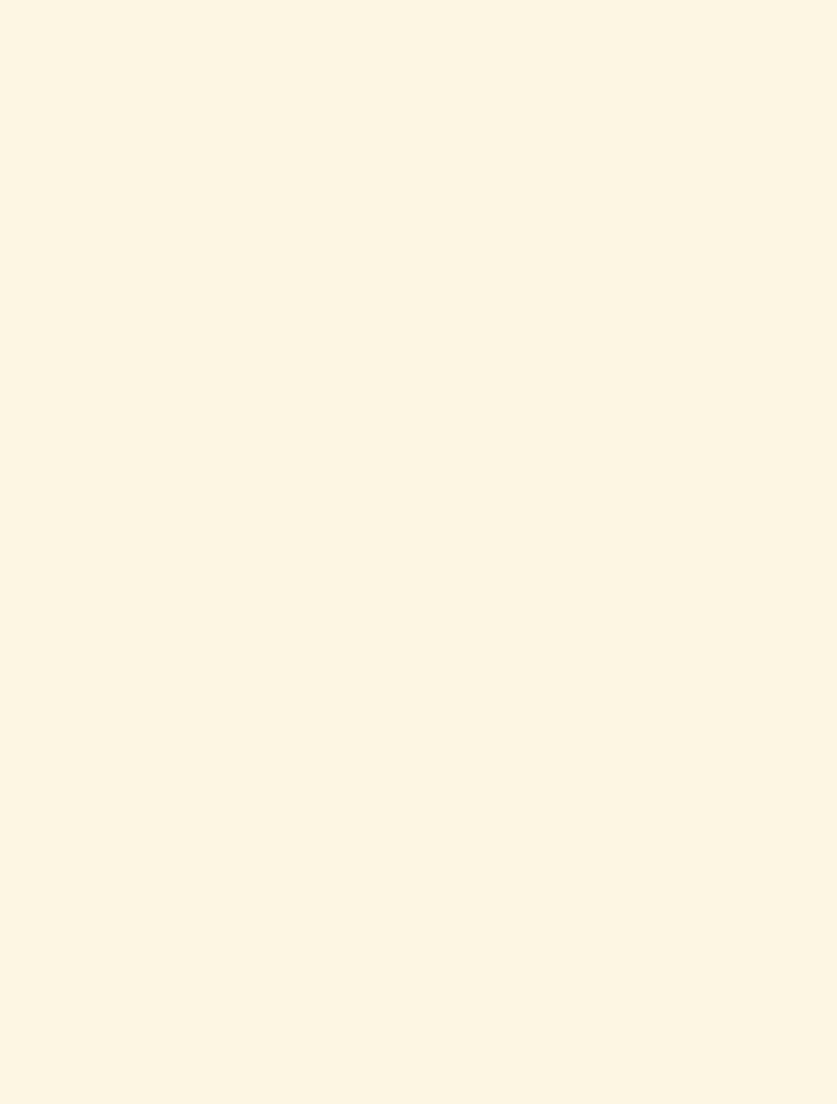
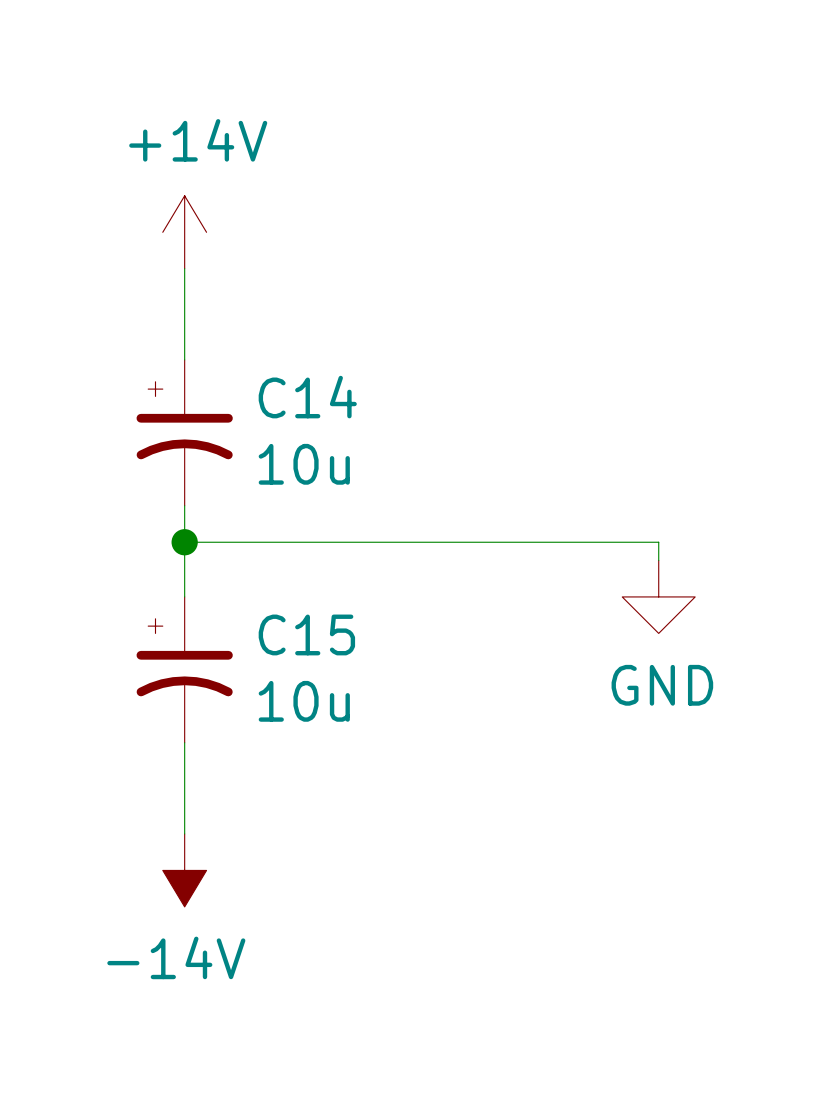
power symbol: none -> +14V (184, 232)
wire: none -> (184, 268) (184, 359)
C14: none -> 10u (184, 432)
wire: none -> (184, 505) (184, 596)
wire: none -> (184, 542) (658, 542) (658, 560)
junction: none -> (184, 542)
power symbol: none -> GND (658, 596)
C15: none -> 10u (184, 669)
wire: none -> (184, 742) (184, 833)
power symbol: none -> -14V (184, 870)

